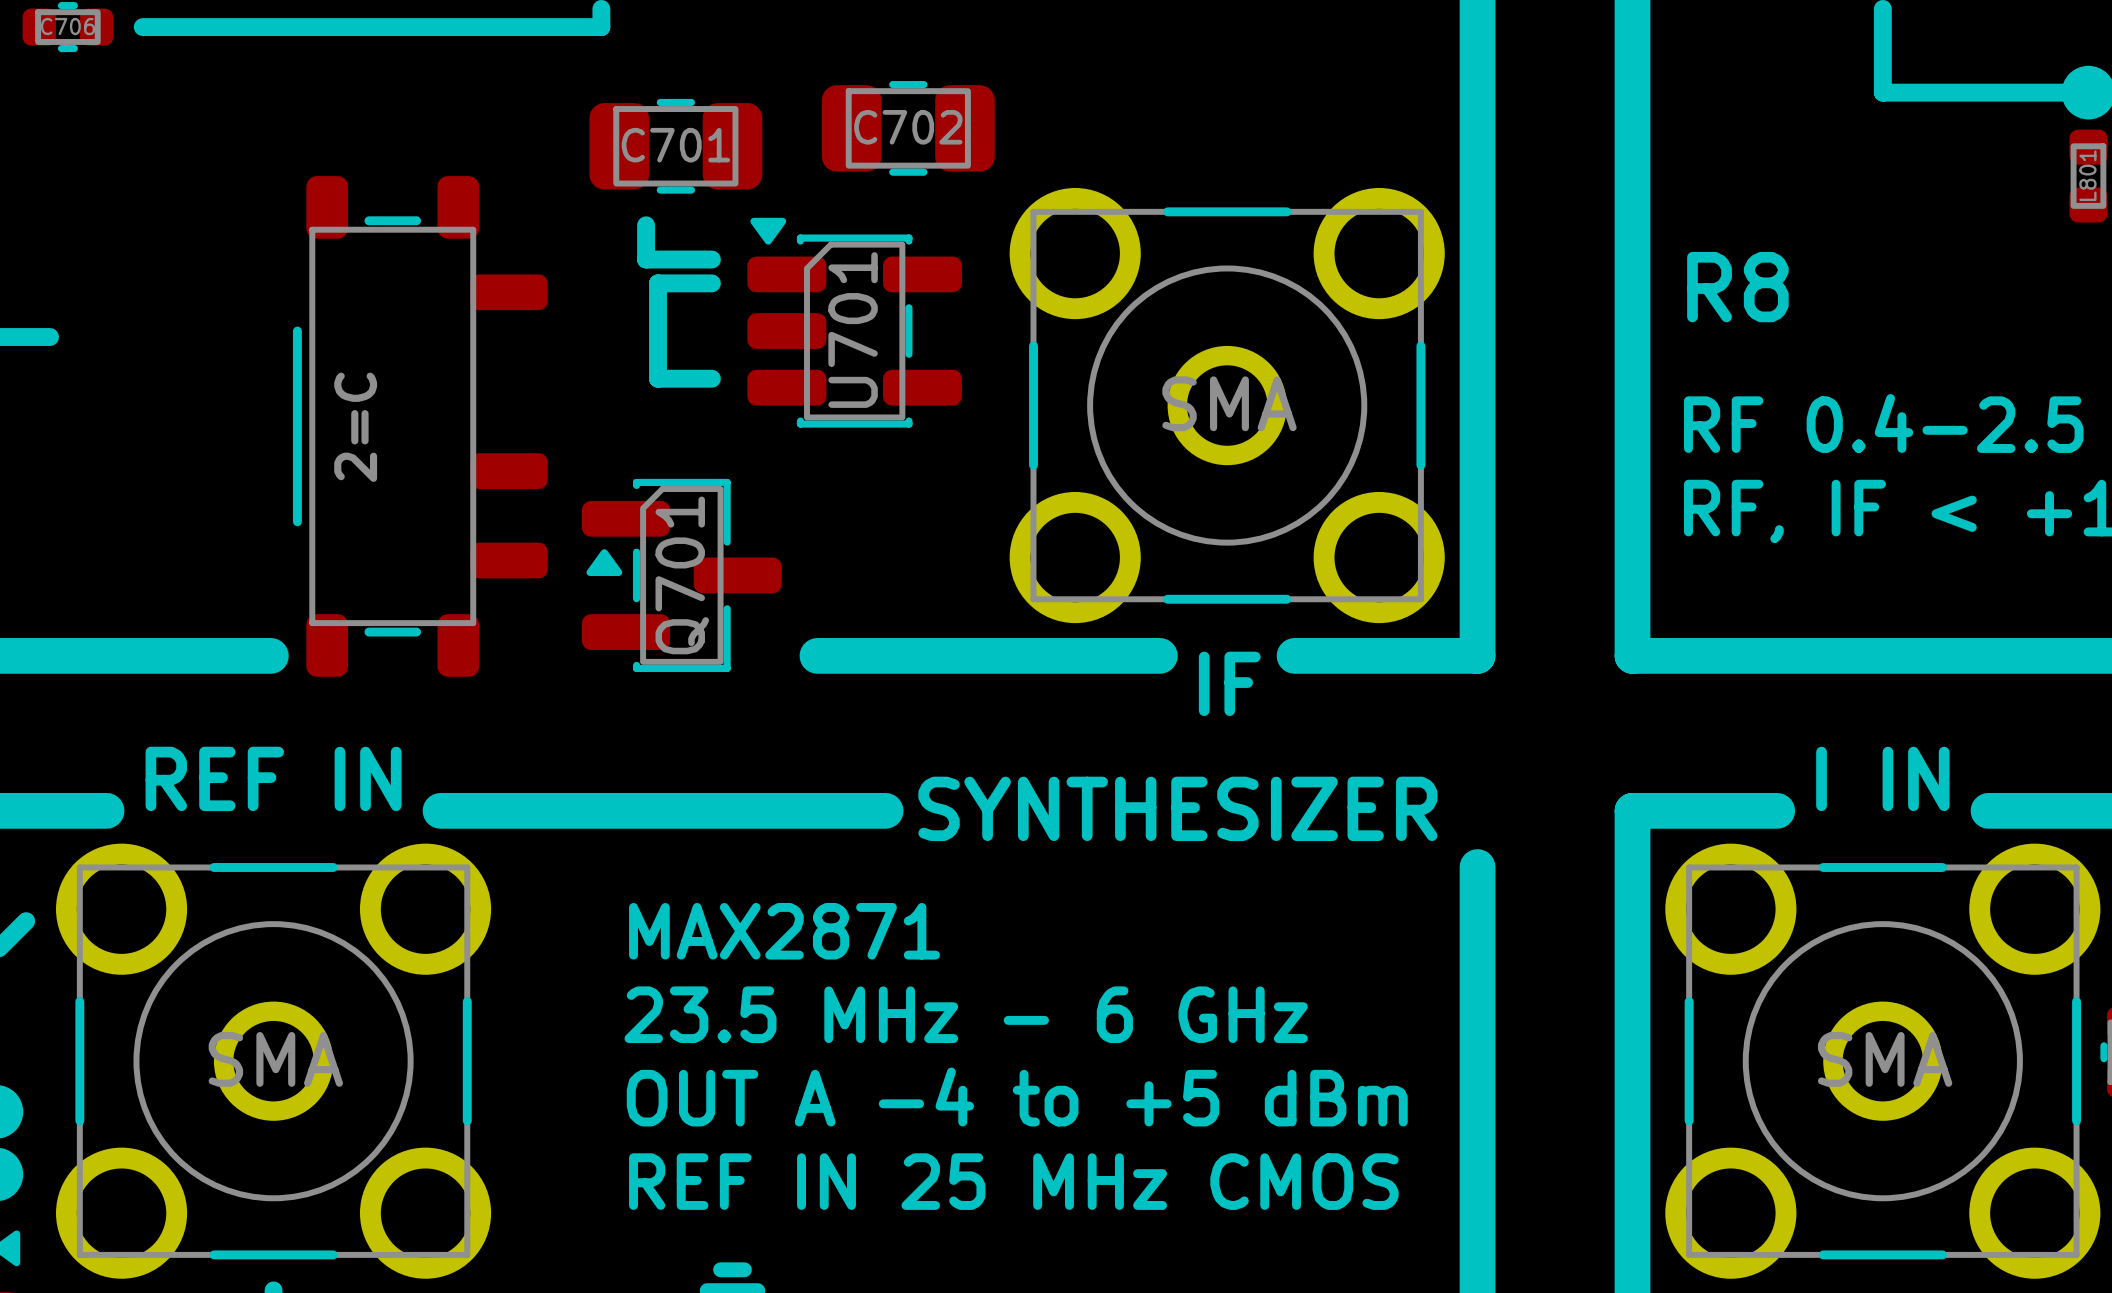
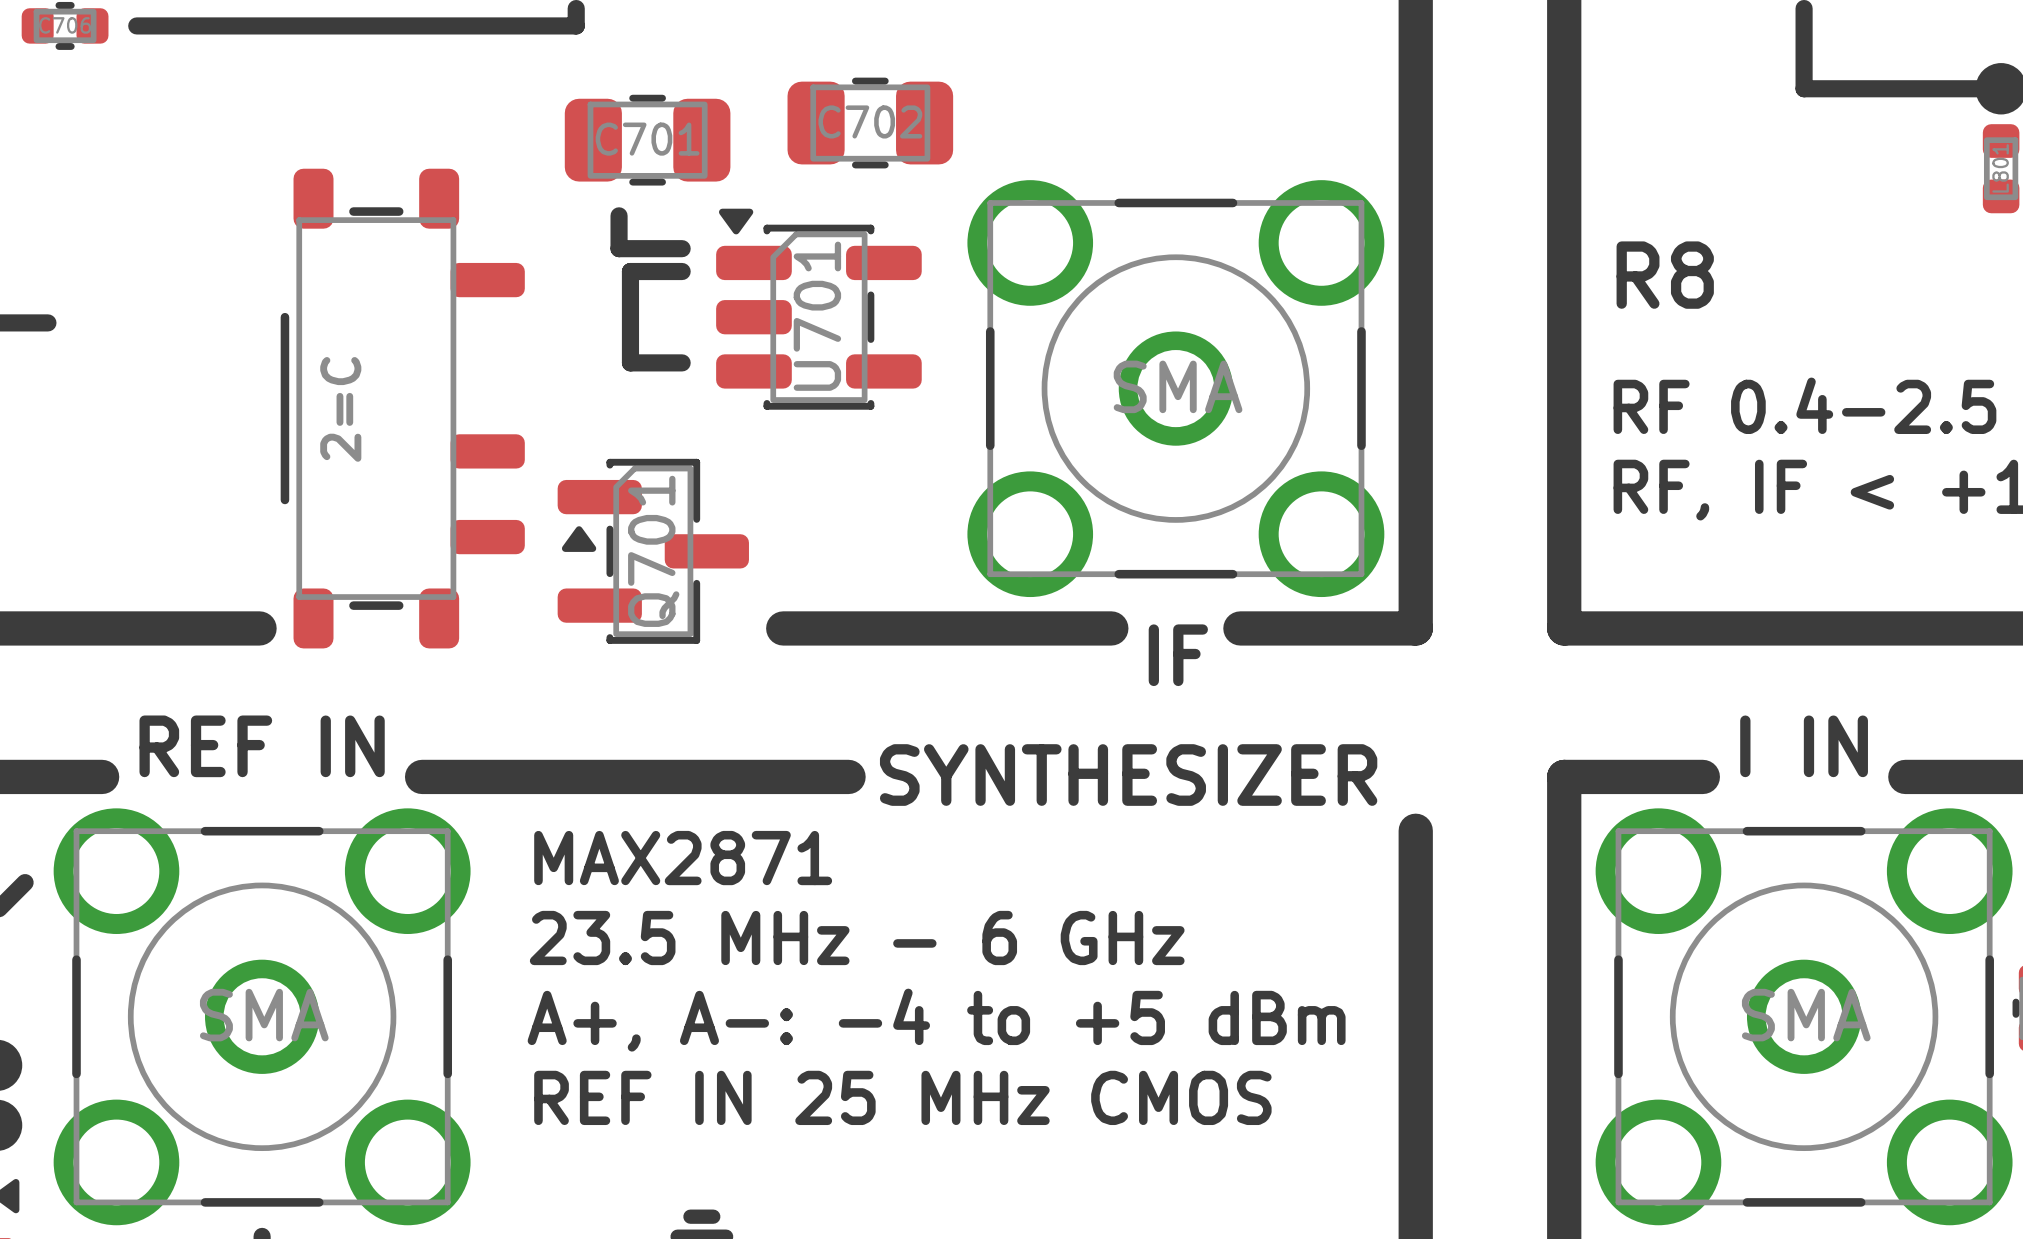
text position: MAX2871 (784, 931) -> MAX2871 (683, 858)
text position: 23.5 MHz - 6 GHz (966, 1014) -> 23.5 MHz - 6 GHz (857, 937)
text: OUT A -4 to +5 dBm (1017, 1097) -> A+, A-: -4 to +5 dBm (936, 1020)
text position: REF IN 25 MHz CMOS (1013, 1181) -> REF IN 25 MHz CMOS (902, 1097)

